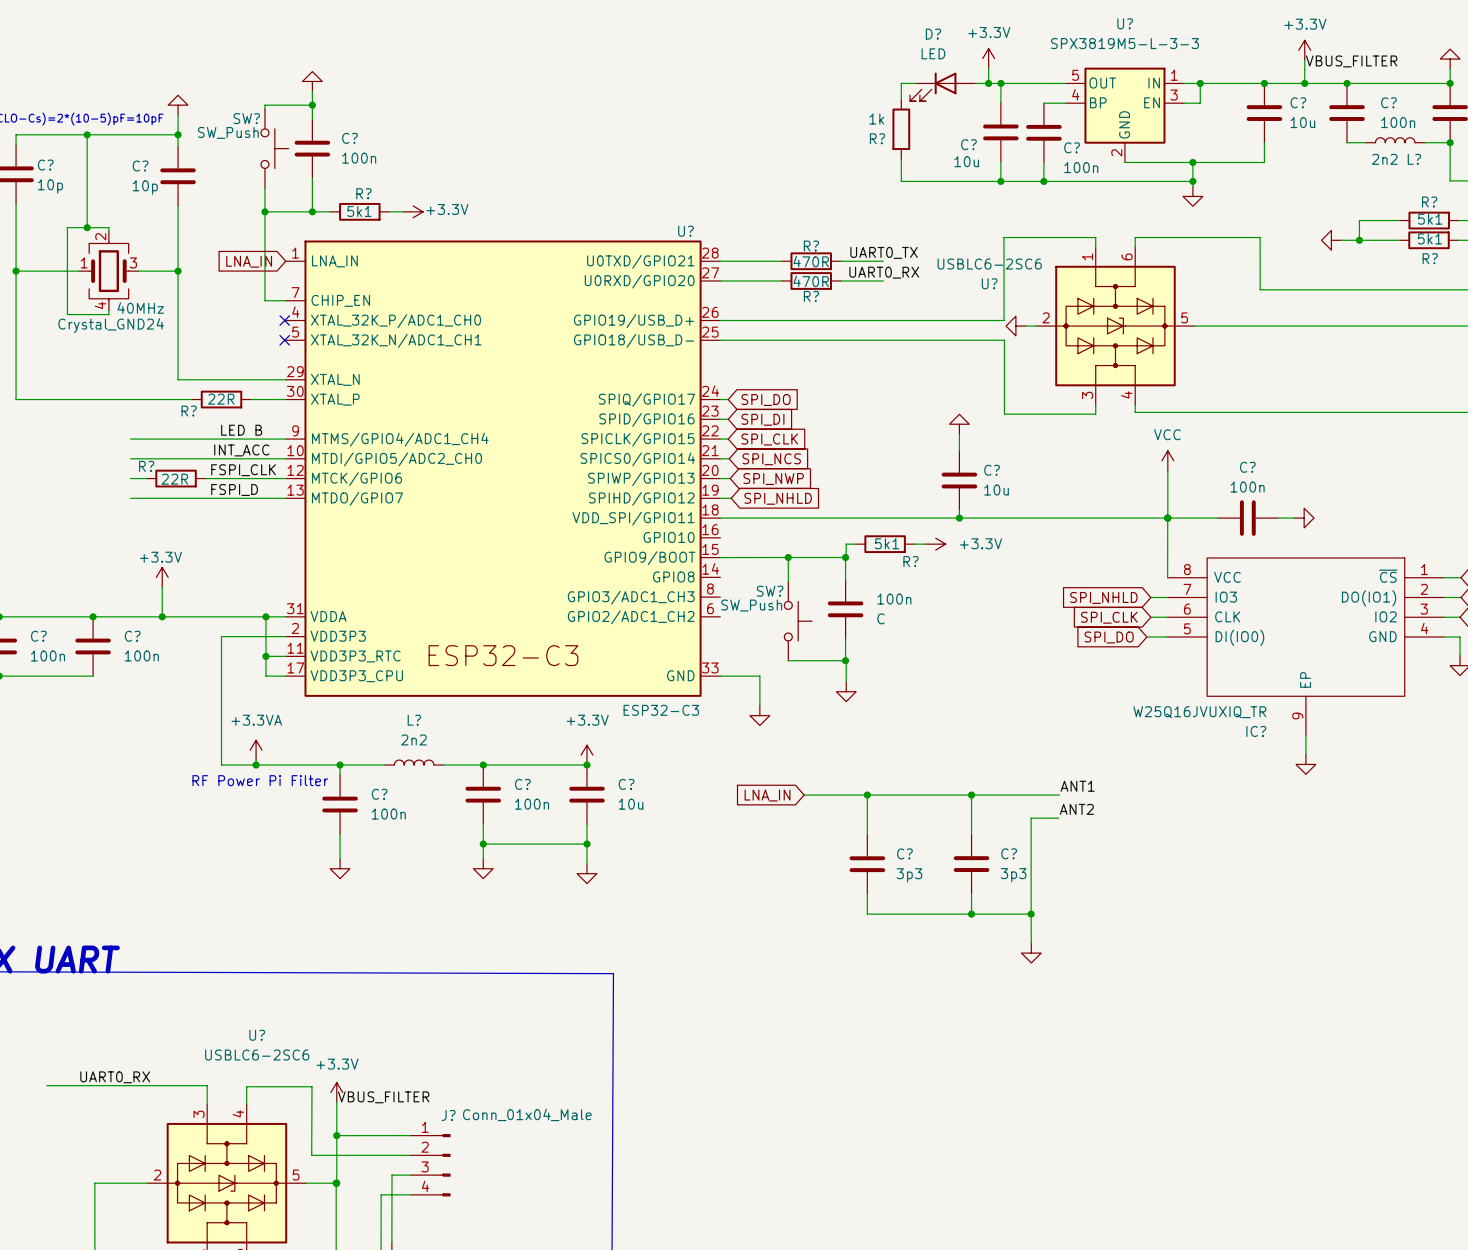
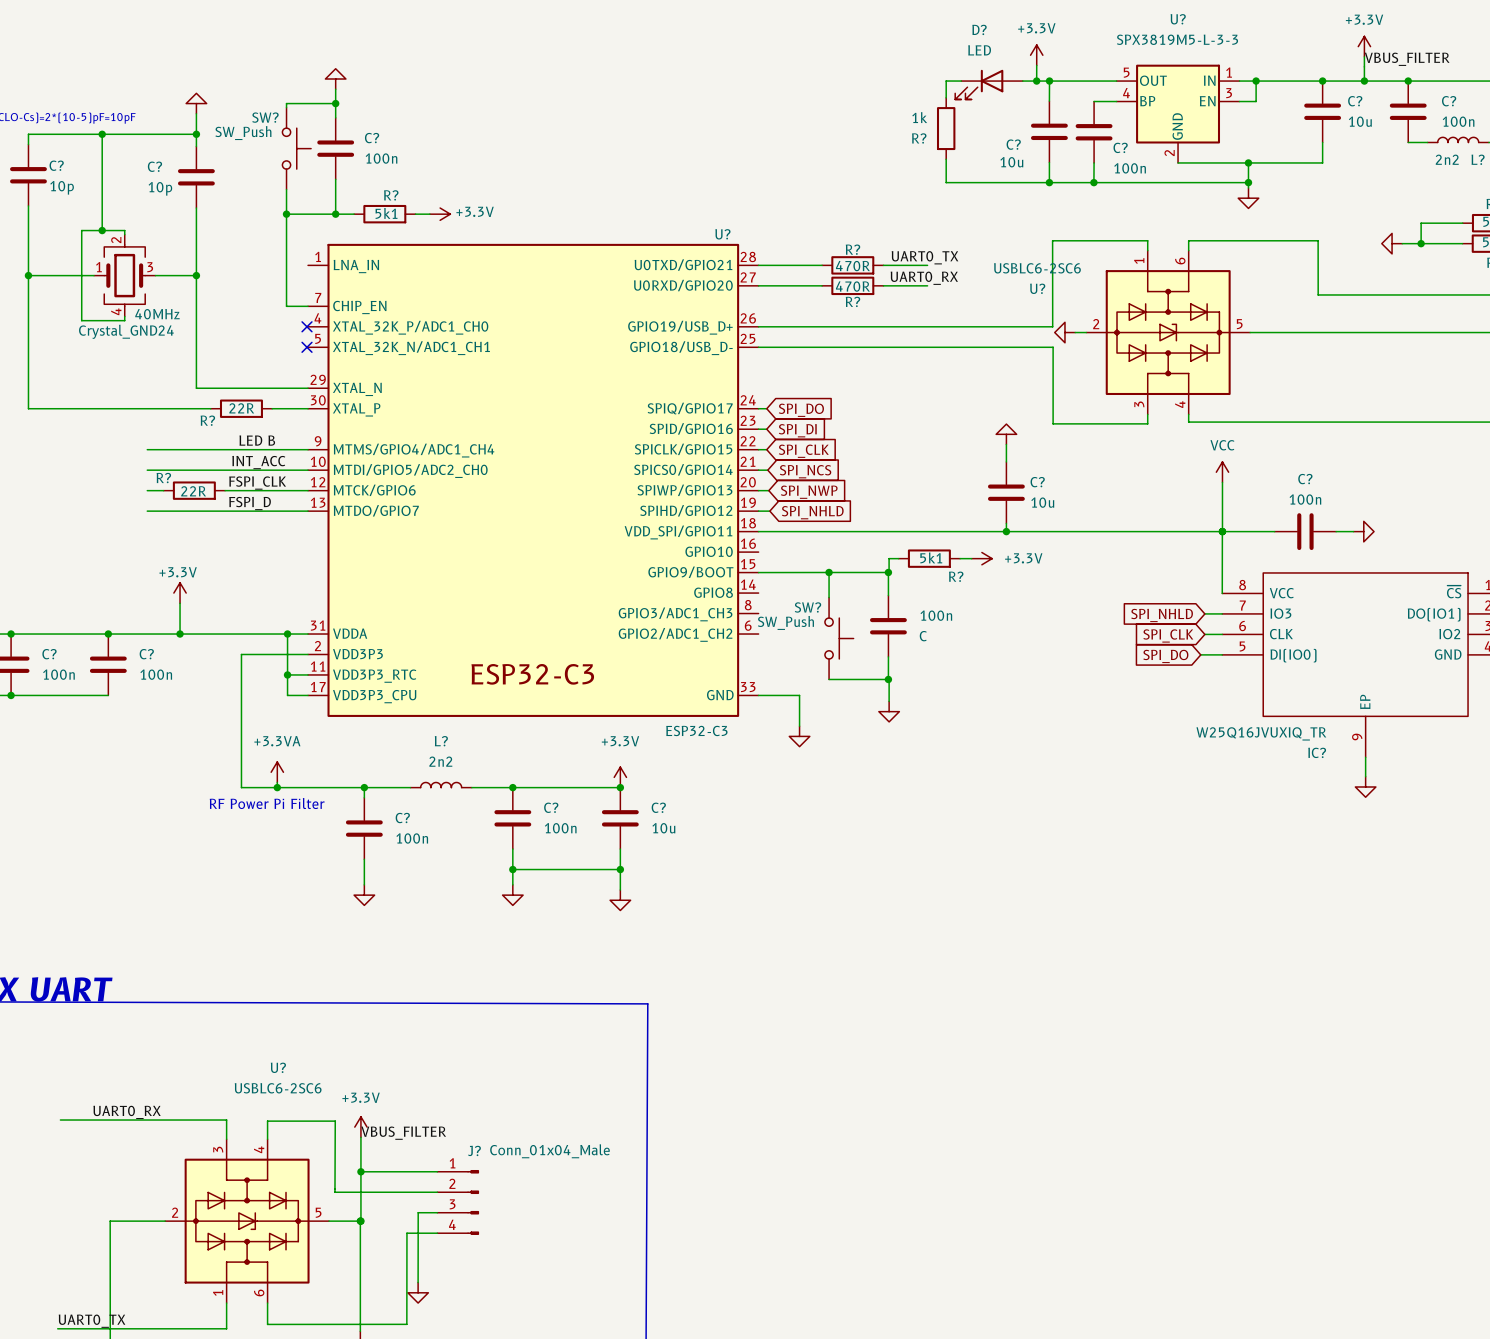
global label: LNA_IN (249, 261) -> none
label: ANT1 (1077, 786) -> none
global label: LNA_IN (767, 795) -> none
wire: (804, 795) (1059, 795) -> none
wire: (867, 795) (867, 834) -> none
junction: (867, 795) -> none
wire: (971, 795) (971, 834) -> none
junction: (971, 795) -> none
label: ANT2 (1076, 809) -> none
wire: (1058, 818) (1031, 818) (1031, 914) -> none
C?: 3p3 (867, 864) -> none
C?: 3p3 (971, 864) -> none
wire: (867, 893) (867, 914) (1031, 914) -> none
wire: (971, 893) (971, 914) -> none
junction: (971, 914) -> none
wire: (1031, 914) (1031, 943) -> none
junction: (1031, 914) -> none
power symbol: (1031, 953) -> none

